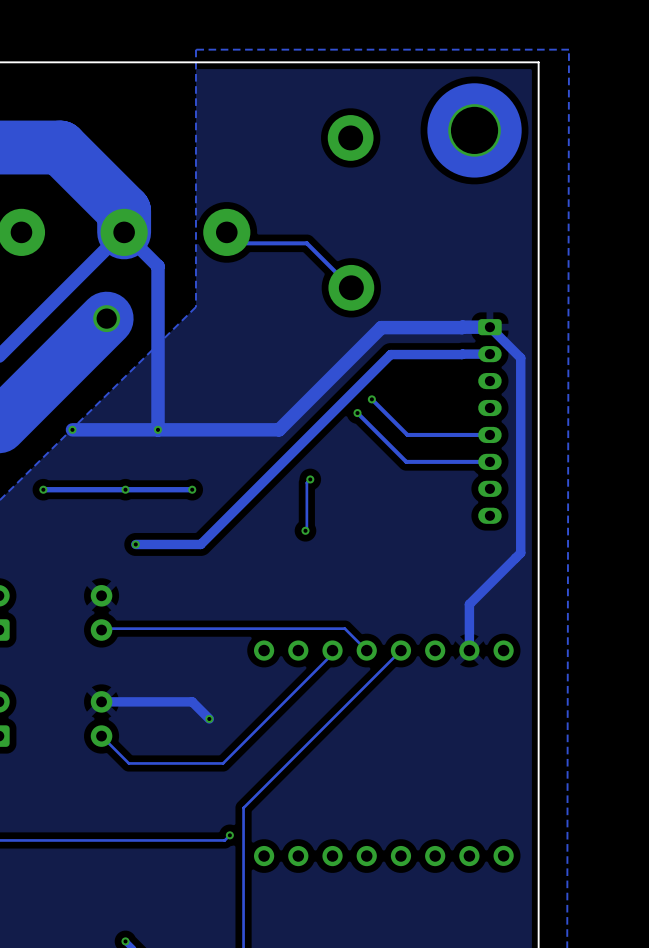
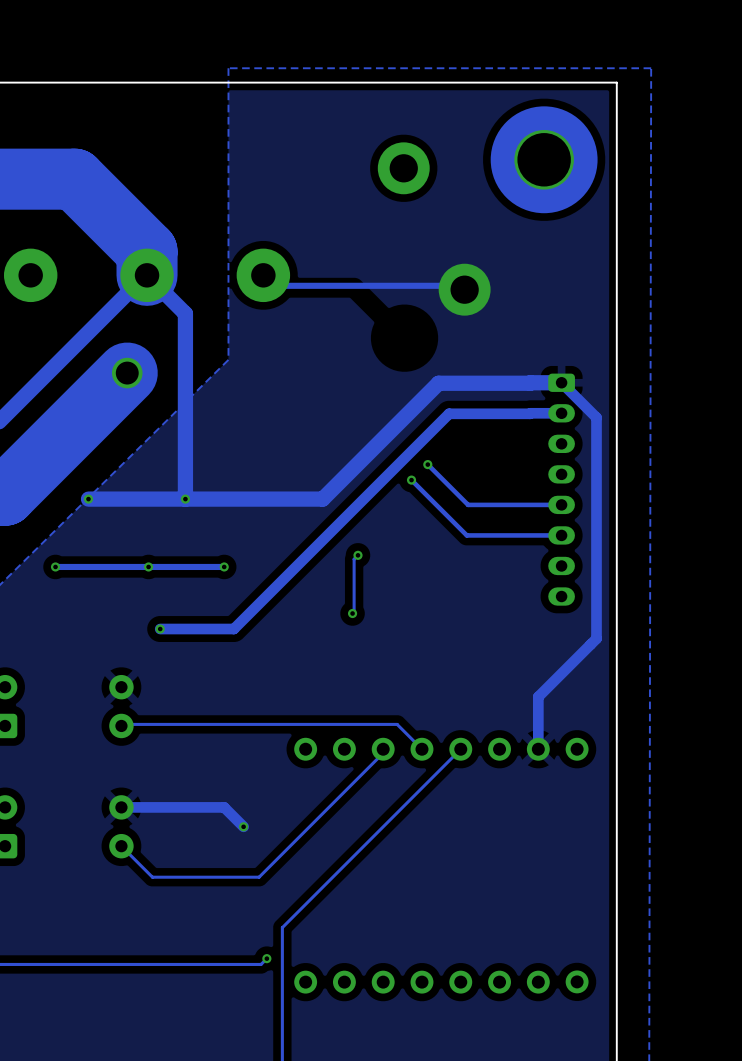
track: (236, 241) (237, 243) (306, 243) (351, 287) -> (273, 285) (460, 285) (464, 289)
part position: (351, 287) -> (464, 289)

